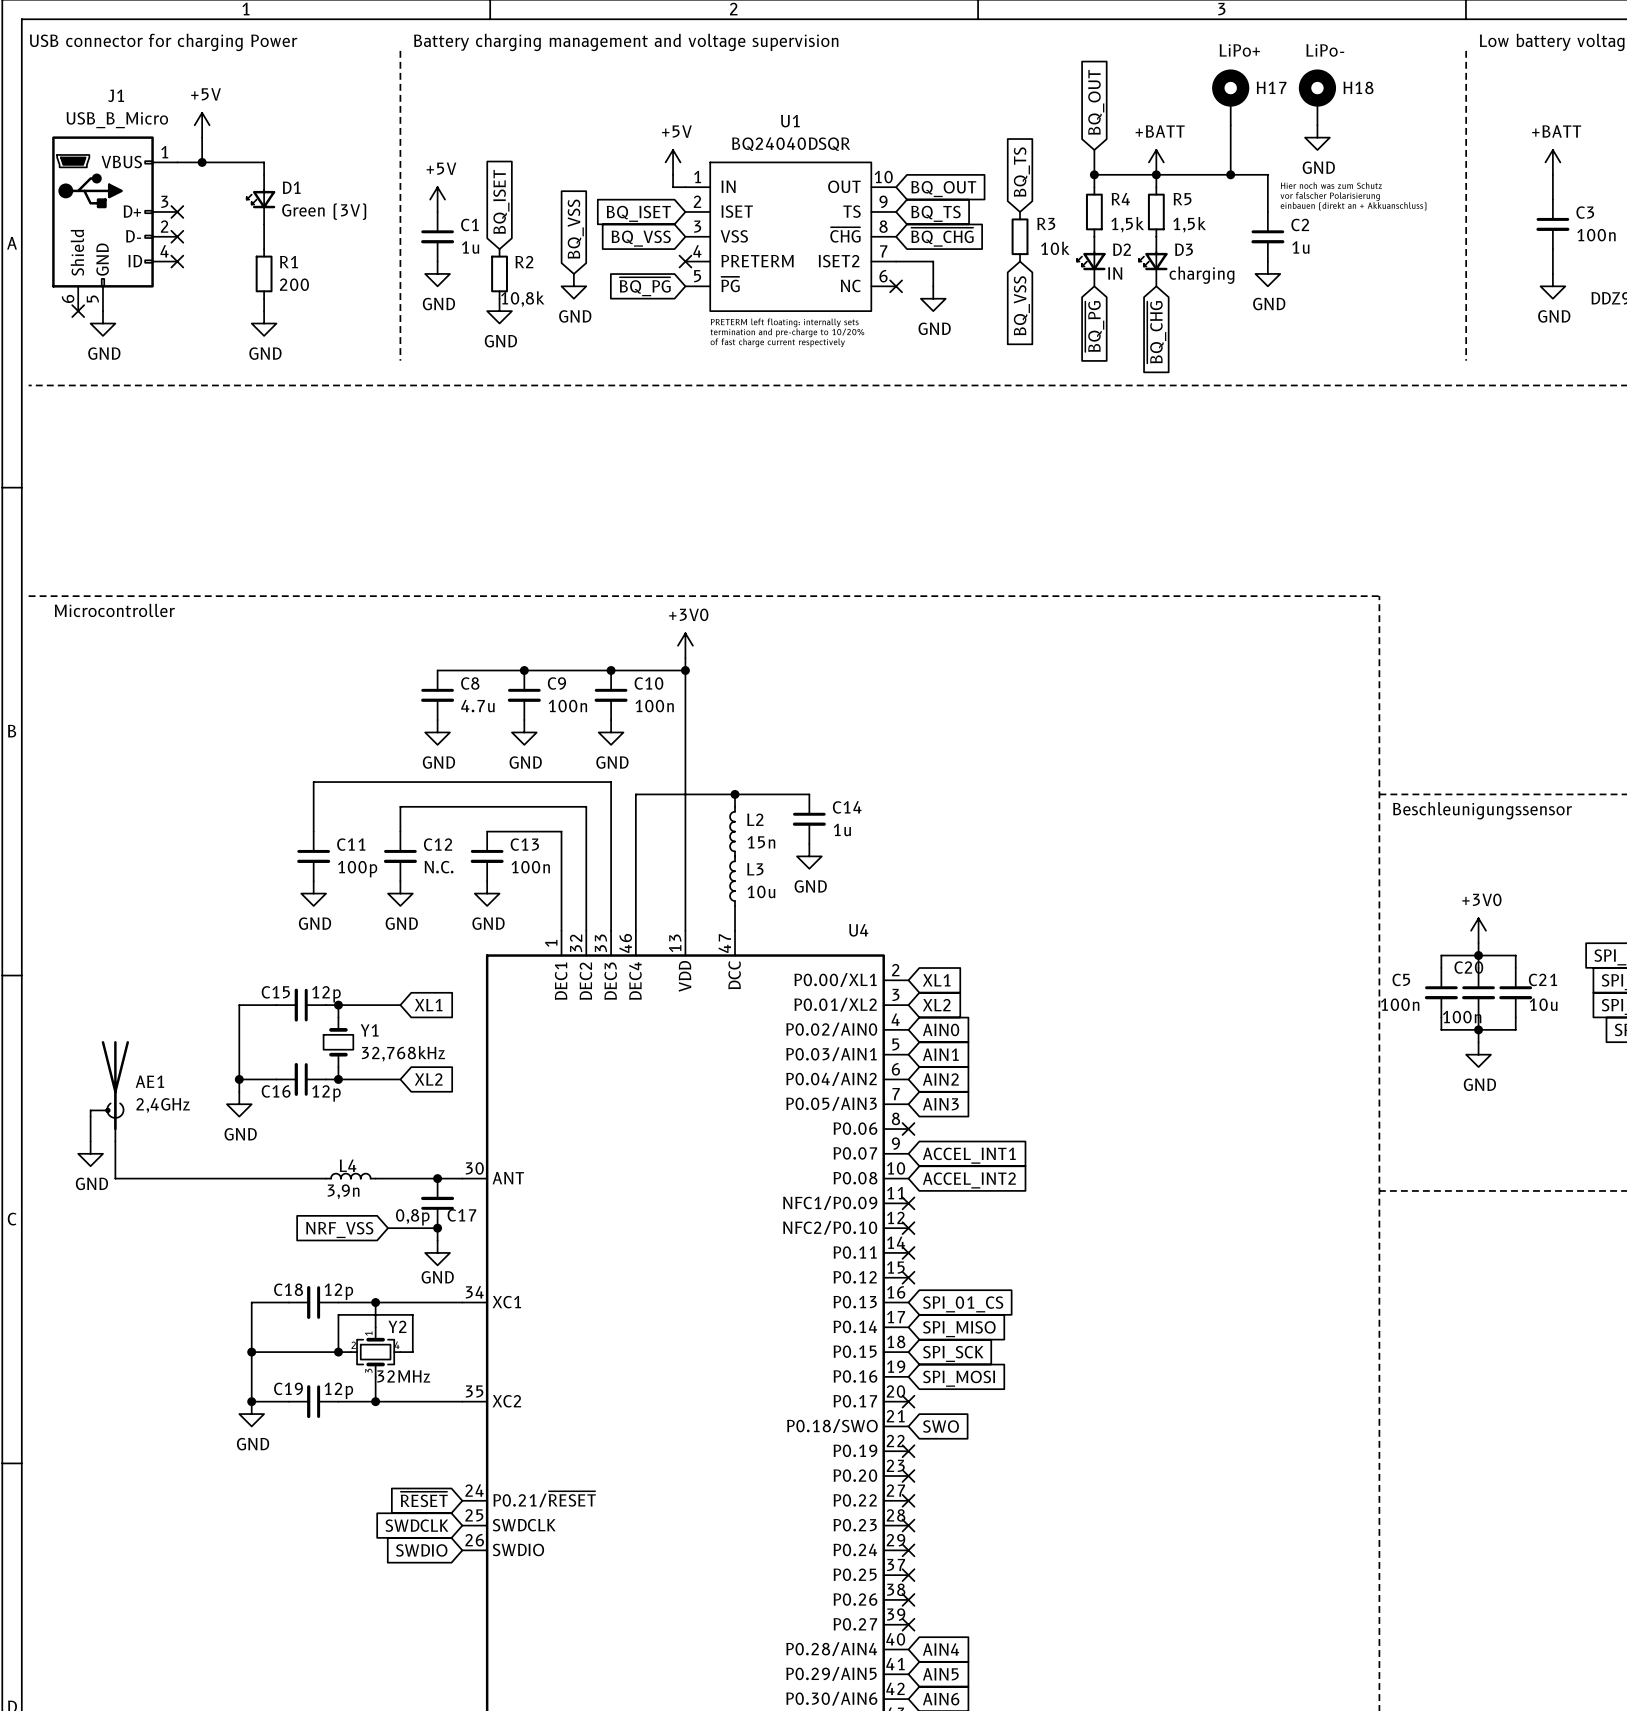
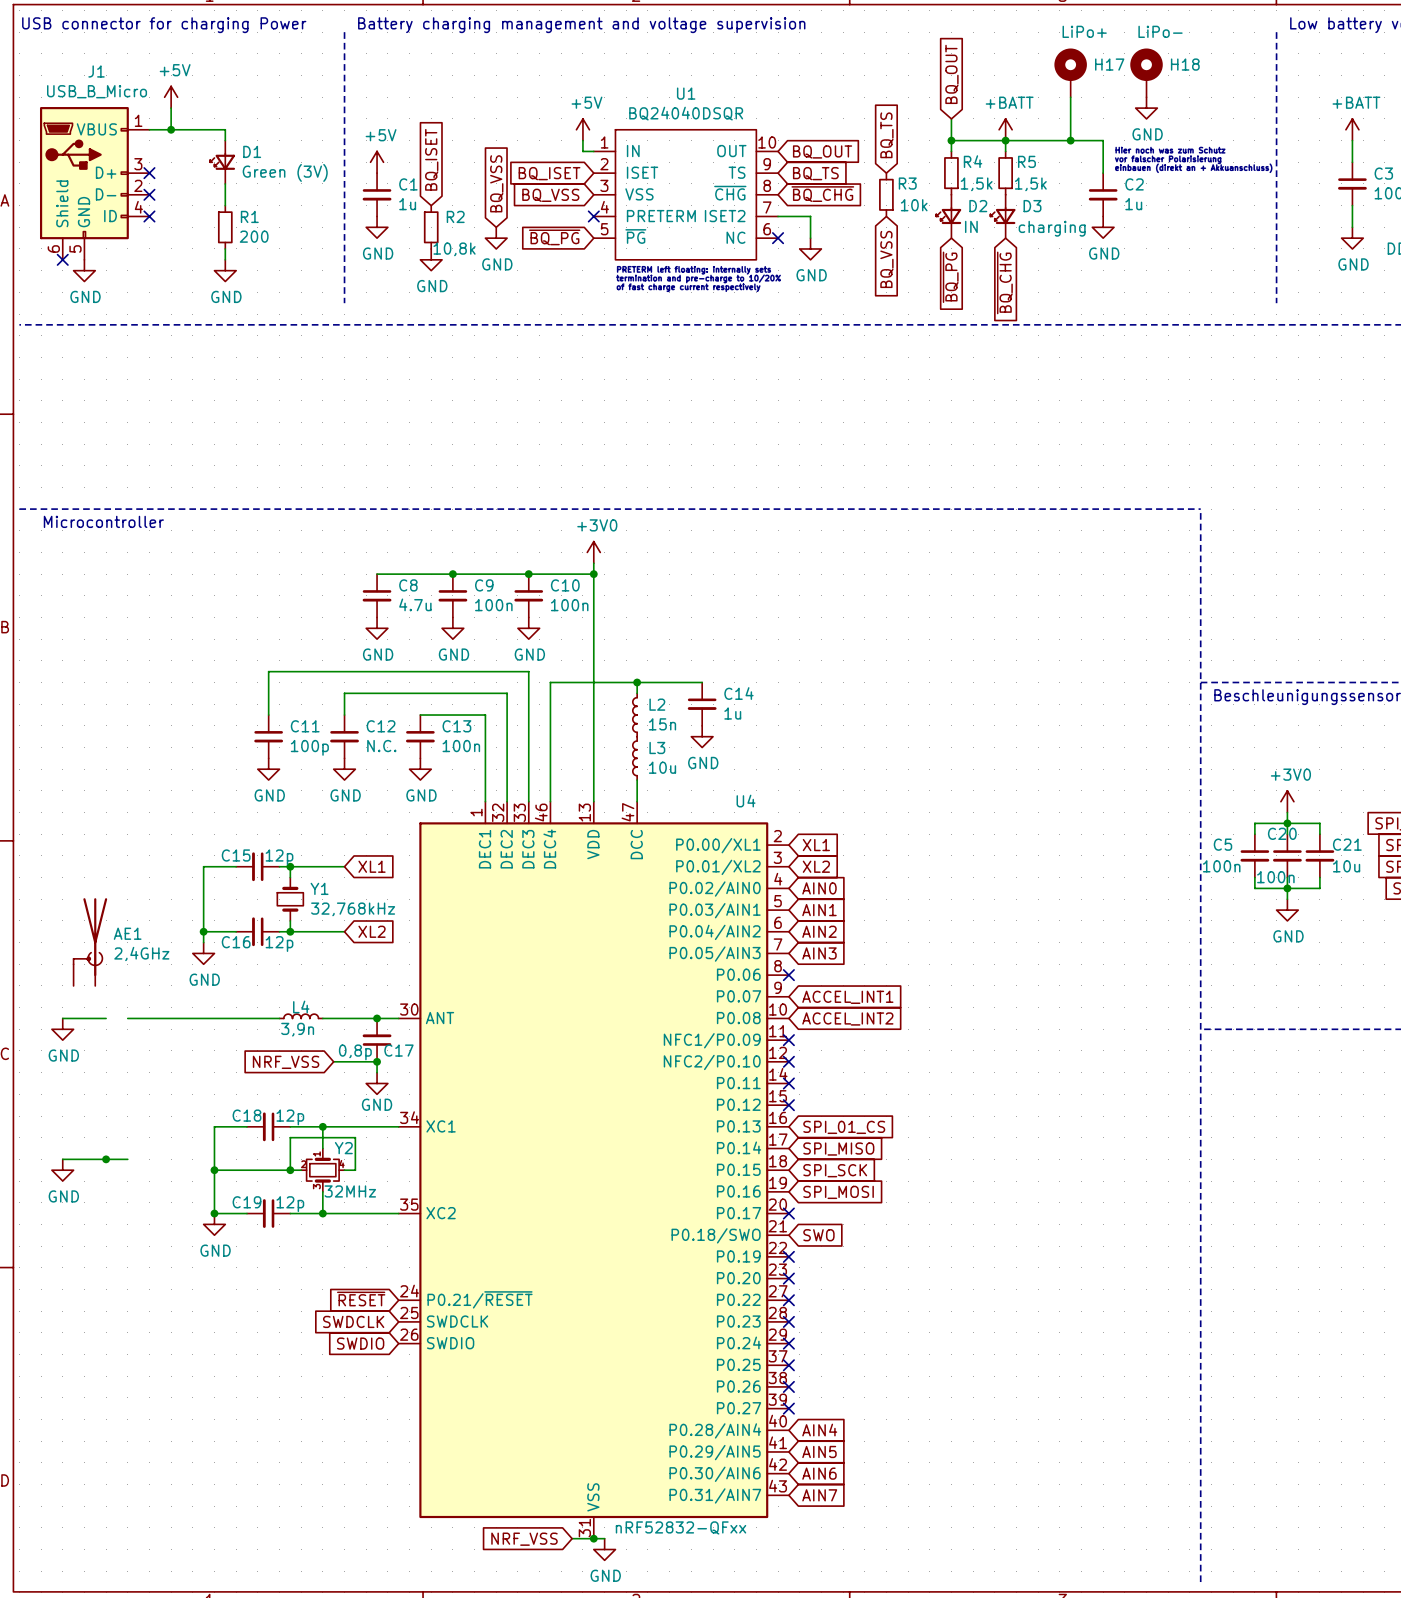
wire: (115, 1141) (115, 1178) -> (62, 1018) (95, 1018)
power symbol position: GND (90, 1153) -> GND (62, 1029)
wire: (127, 1178) (152, 1178) -> none
wire: none -> (62, 1159) (127, 1159)
junction: none -> (106, 1159)
power symbol: none -> GND (62, 1170)

